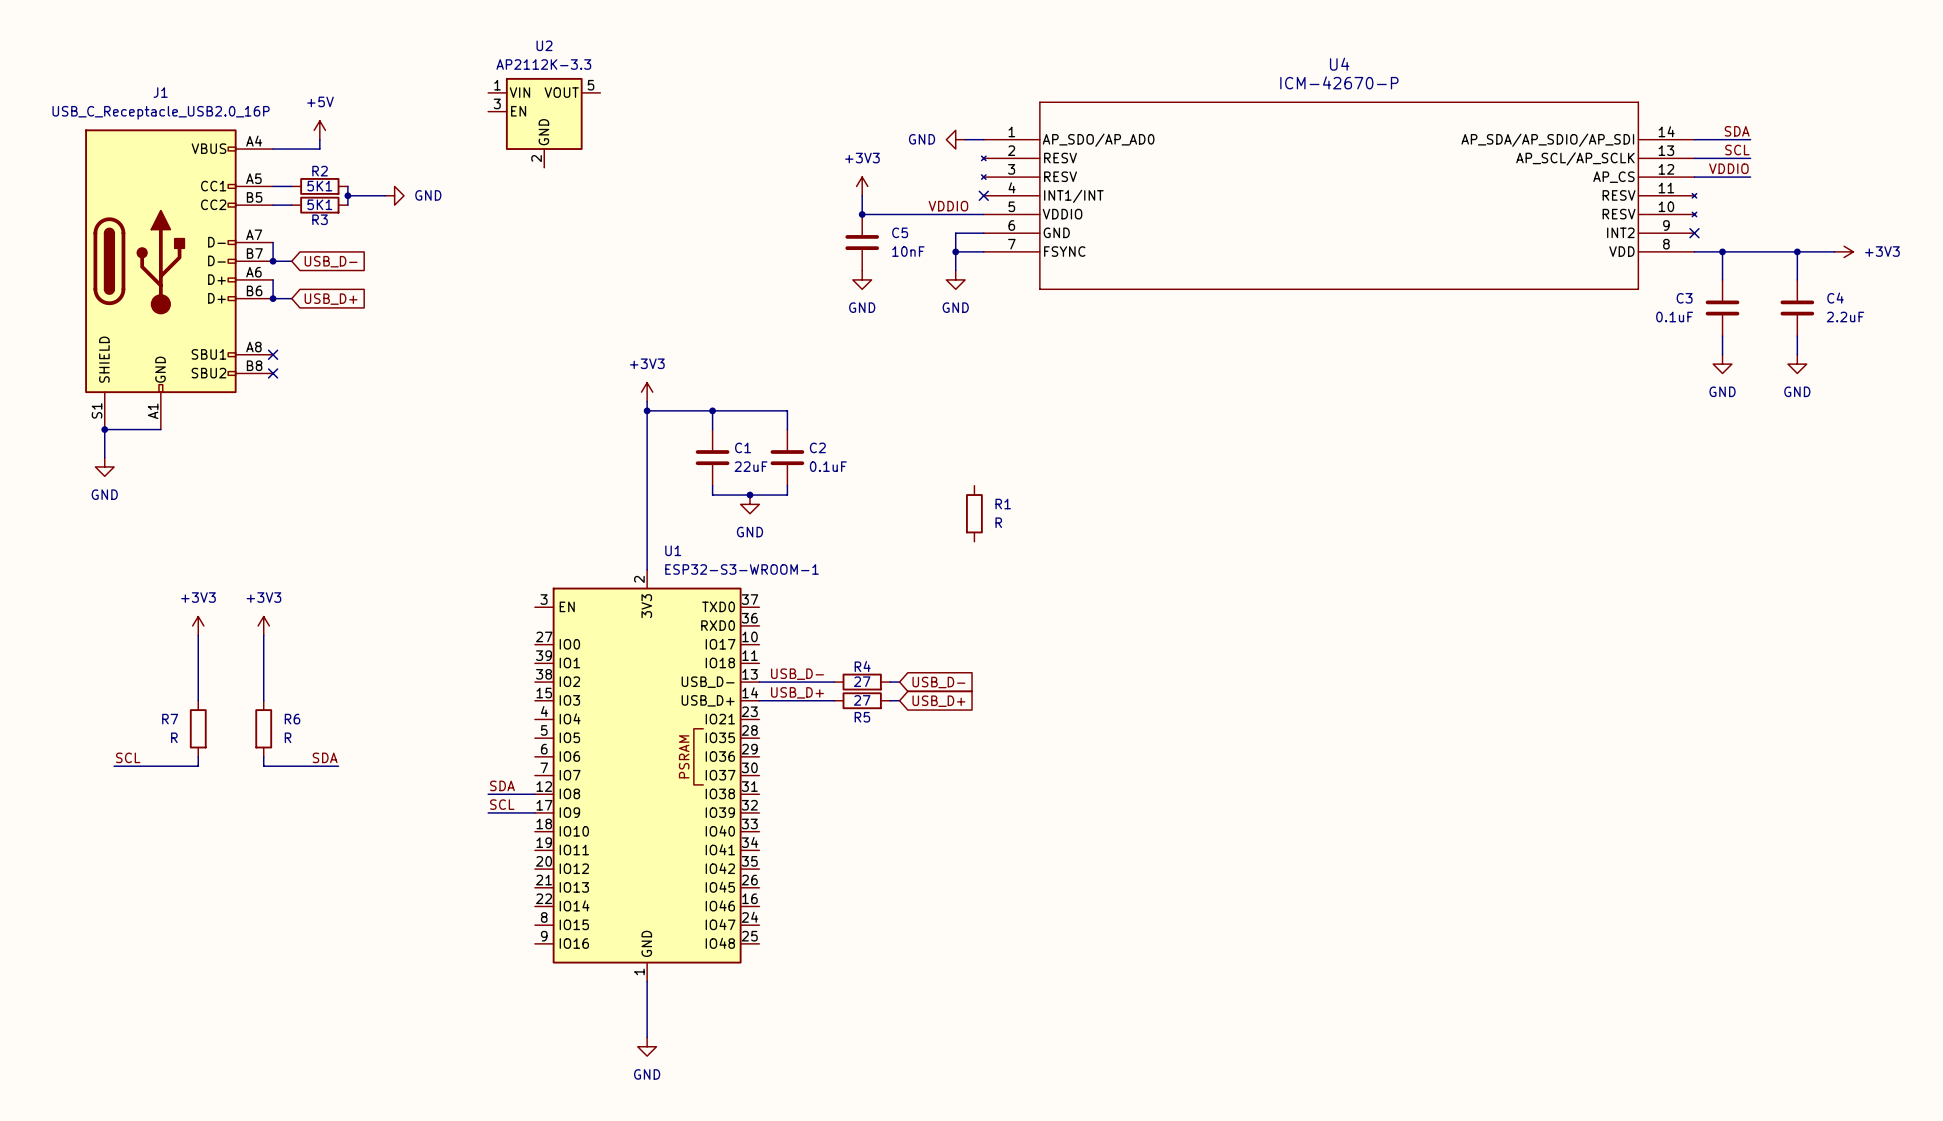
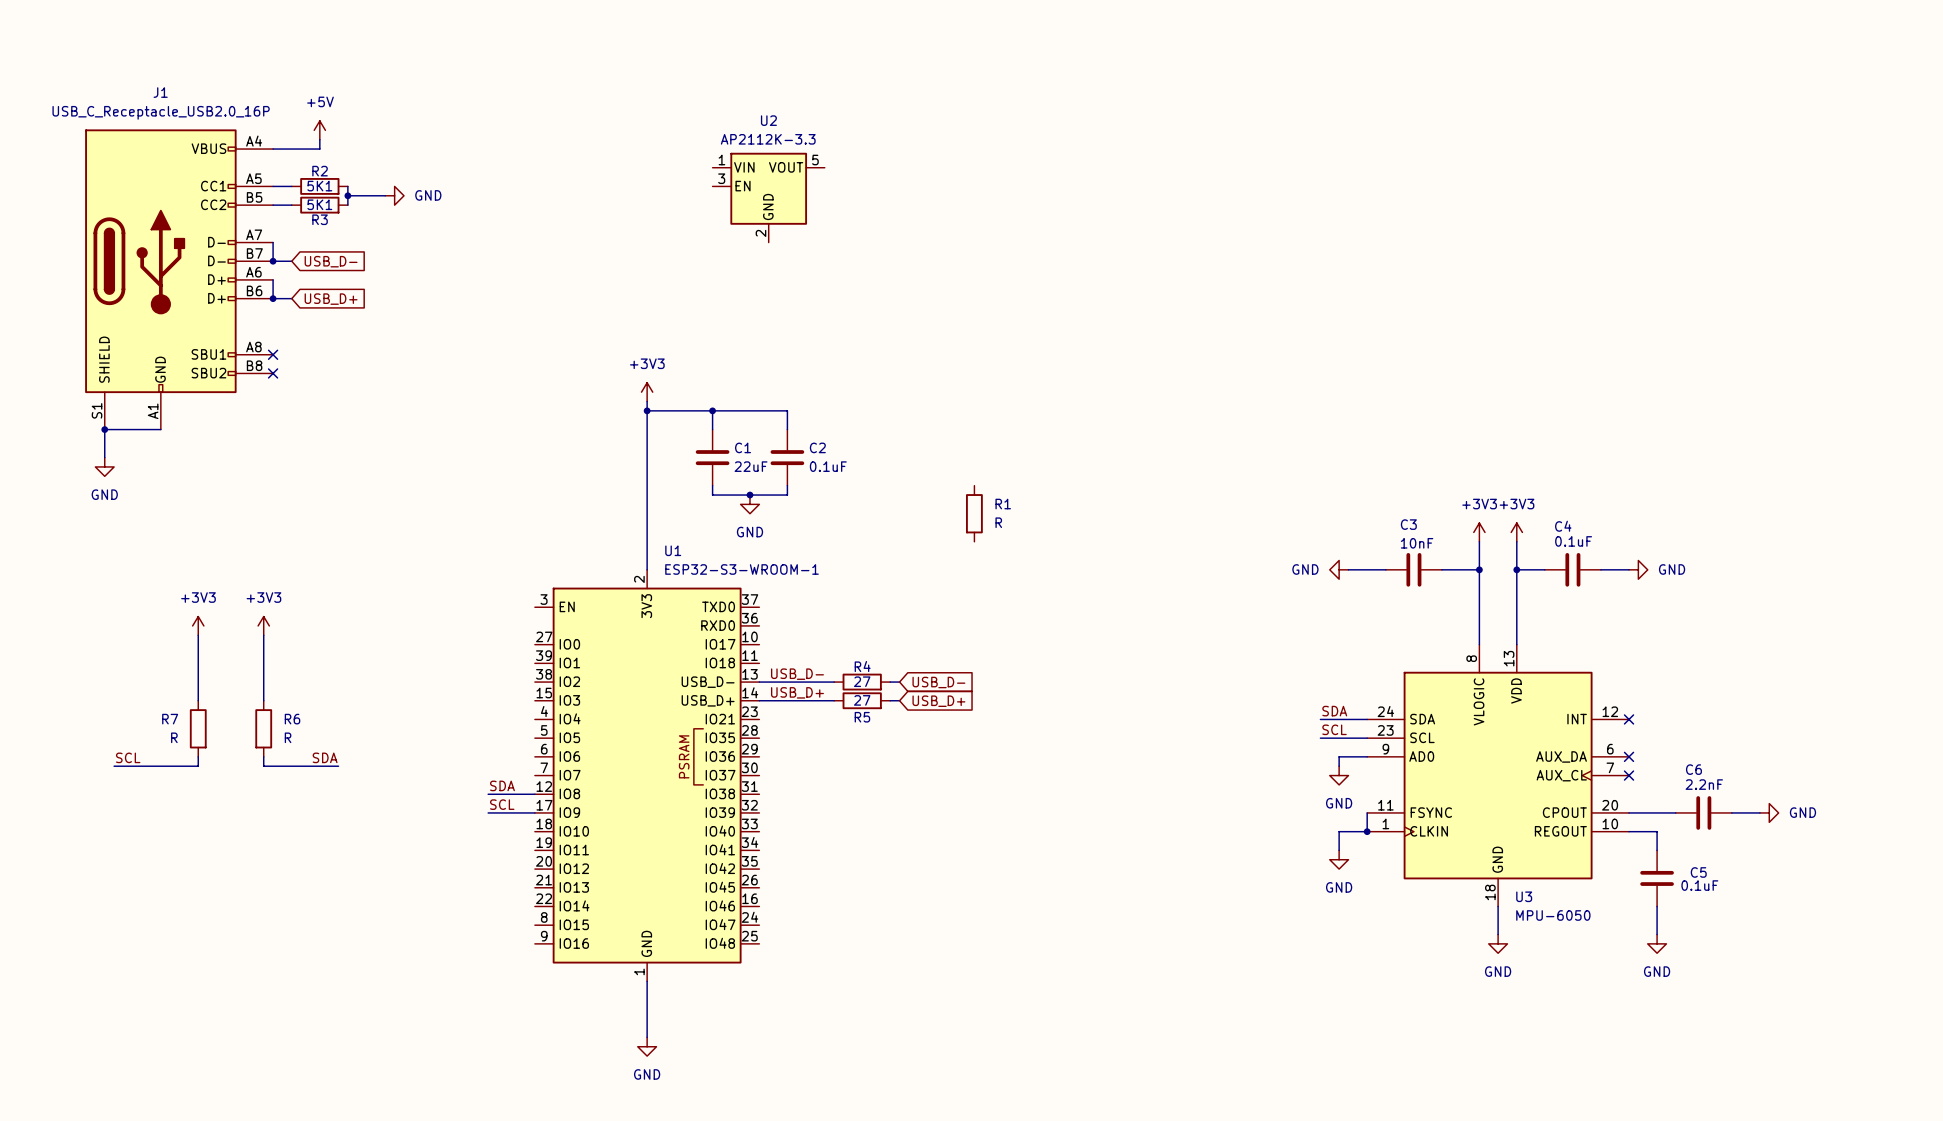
U2 position: (544, 122) -> (768, 197)
label: SDA (1737, 131) -> none
power symbol: GND (955, 139) -> none
wire: (965, 139) (983, 139) -> none
wire: (1694, 139) (1750, 139) -> none
label: SCL (1737, 150) -> none
wire: (1694, 158) (1750, 158) -> none
label: VDDIO (1728, 168) -> none
wire: (1694, 177) (1750, 177) -> none
power symbol: +3V3 (862, 186) -> none
wire: (862, 195) (862, 214) (983, 214) -> none
no-connect mark: (983, 195) -> none
U4: ICM-42670-P (1339, 195) -> none
label: VDDIO (948, 206) -> none
junction: (862, 214) -> none
C5 name position: C5 (900, 232) -> C5 (1698, 872)
wire: (983, 233) (955, 233) (955, 270) -> none
no-connect mark: (1694, 233) -> none
C5 position: (862, 242) -> (1657, 878)
C5 value: 10nF (908, 251) -> 0.1uF (1699, 885)
wire: (955, 251) (983, 251) -> none
junction: (955, 251) -> none
wire: (1694, 251) (1834, 251) -> none
wire: (1722, 251) (1722, 279) -> none
junction: (1722, 251) -> none
wire: (1797, 251) (1797, 279) -> none
junction: (1797, 251) -> none
power symbol: +3V3 (1844, 251) -> none
power symbol: GND (862, 279) -> none
power symbol: GND (955, 279) -> none
C4 name position: C4 (1835, 298) -> C4 (1563, 526)
C3 rotation: 0° (1722, 308) -> 90° clockwise (1413, 569)
C3 position: (1722, 308) -> (1413, 569)
C4 rotation: 0° (1797, 308) -> 90° clockwise (1572, 569)
C4 position: (1797, 308) -> (1572, 569)
C3 value: 0.1uF (1674, 317) -> 10nF (1417, 543)
C4 value: 2.2uF (1845, 317) -> 0.1uF (1573, 541)
wire: (1722, 336) (1722, 354) -> none
wire: (1797, 336) (1797, 354) -> none
power symbol: GND (1722, 364) -> none
power symbol: GND (1797, 364) -> none
power symbol: none -> +3V3 (1479, 532)
power symbol: none -> +3V3 (1516, 532)
wire: none -> (1479, 541) (1479, 644)
wire: none -> (1516, 541) (1516, 644)
power symbol: none -> GND (1339, 569)
wire: none -> (1348, 569) (1385, 569)
wire: none -> (1441, 569) (1479, 569)
junction: none -> (1479, 569)
wire: none -> (1516, 569) (1544, 569)
junction: none -> (1516, 569)
wire: none -> (1600, 569) (1629, 569)
power symbol: none -> GND (1638, 569)
label: none -> SDA (1334, 711)
wire: none -> (1320, 719) (1367, 719)
no-connect mark: none -> (1629, 719)
label: none -> SCL (1334, 729)
wire: none -> (1320, 738) (1367, 738)
wire: none -> (1367, 756) (1339, 756) (1339, 766)
no-connect mark: none -> (1629, 756)
power symbol: none -> GND (1339, 775)
U3: none -> MPU-6050 (1498, 775)
no-connect mark: none -> (1629, 775)
wire: none -> (1367, 812) (1367, 831) (1339, 831) (1339, 850)
wire: none -> (1629, 812) (1675, 812)
C6: none -> 2.2nF (1703, 812)
wire: none -> (1731, 812) (1759, 812)
power symbol: none -> GND (1769, 812)
junction: none -> (1367, 831)
wire: none -> (1629, 831) (1657, 831) (1657, 850)
power symbol: none -> GND (1339, 859)
wire: none -> (1498, 906) (1498, 934)
wire: none -> (1657, 906) (1657, 934)
power symbol: none -> GND (1498, 943)
power symbol: none -> GND (1657, 943)

